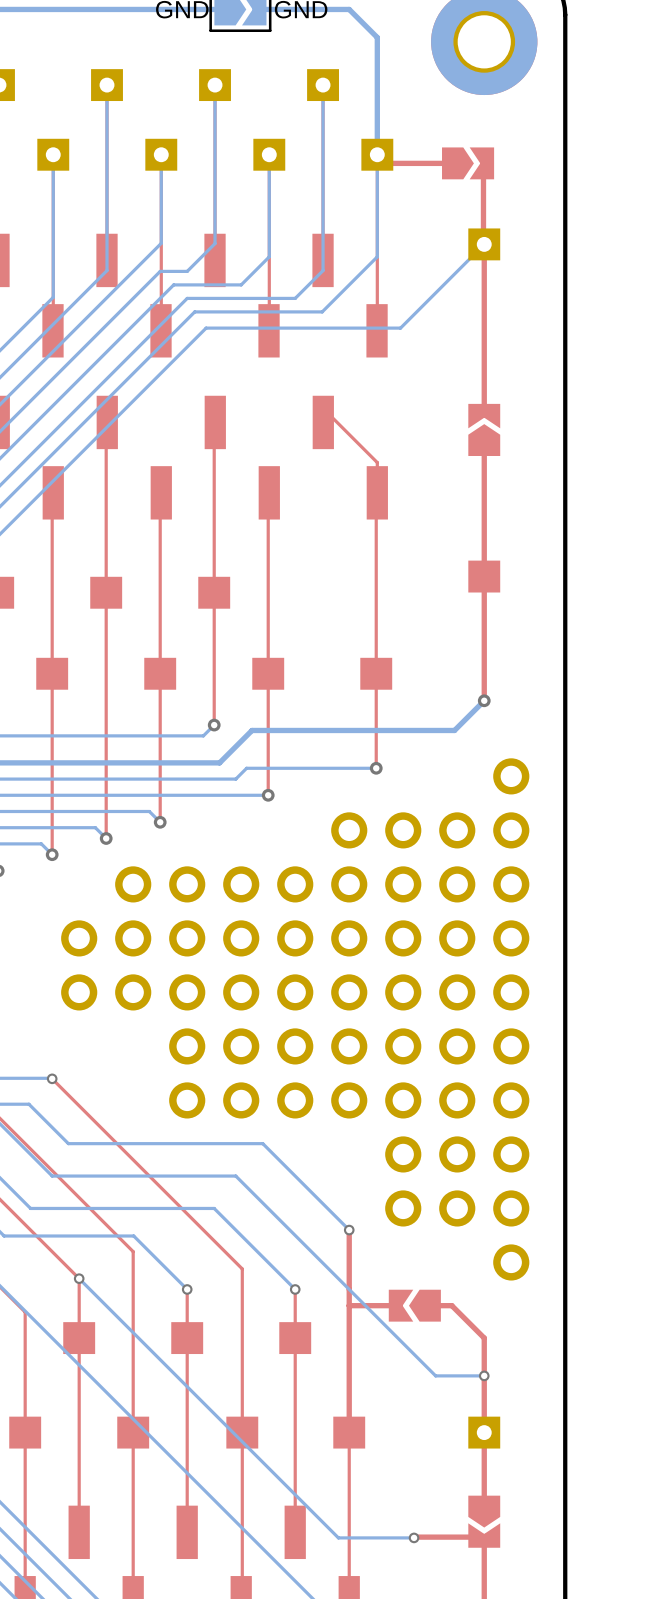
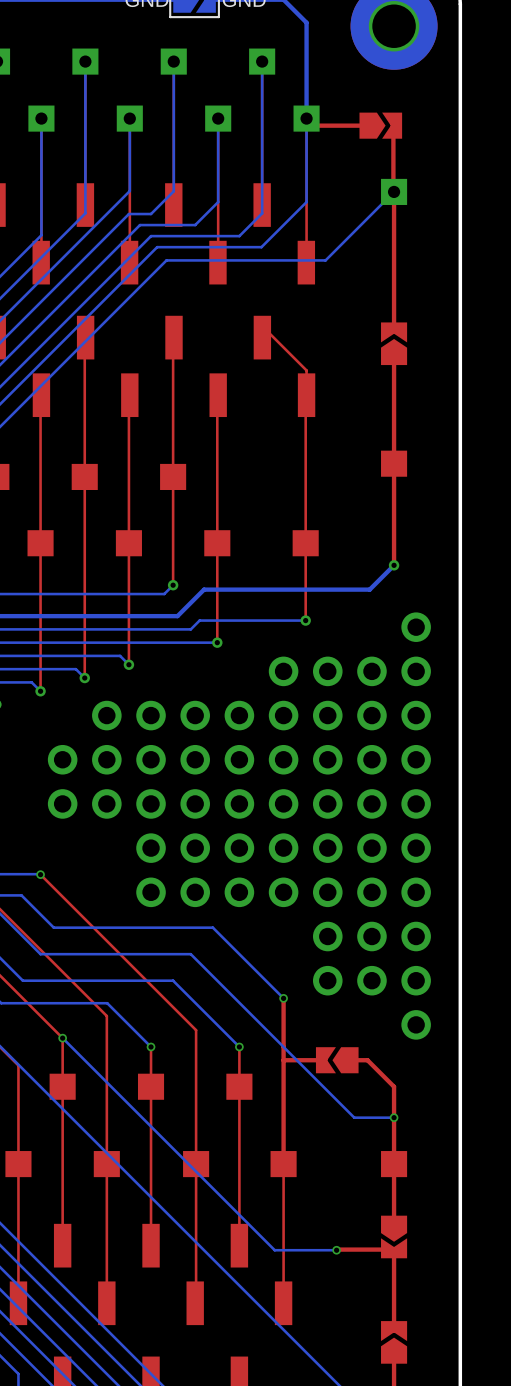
part footprint: [468, 1416, 501, 1449] -> [381, 1151, 408, 1178]

